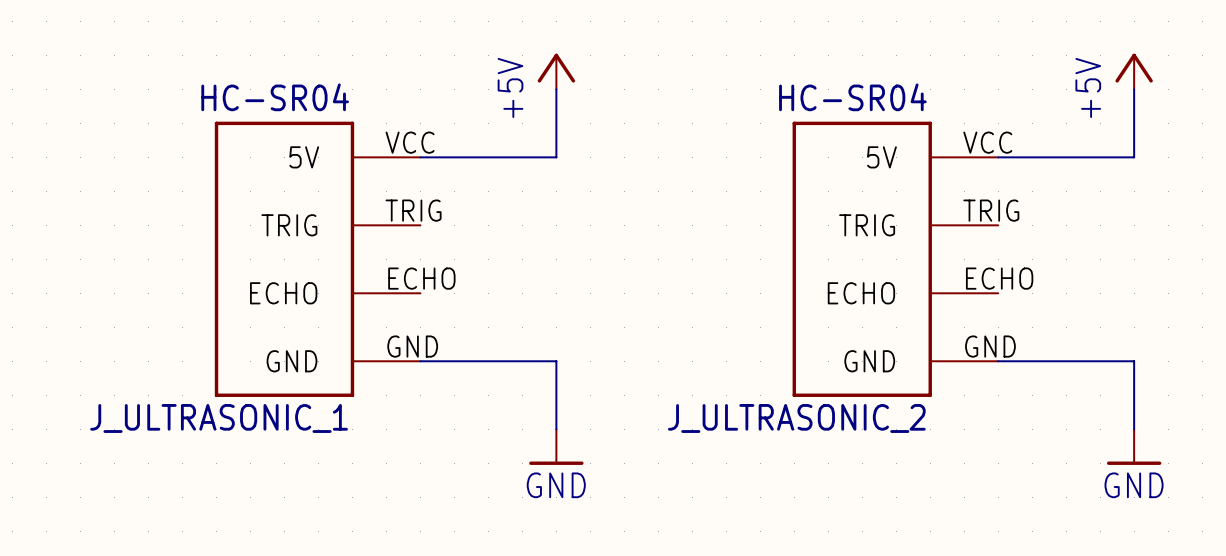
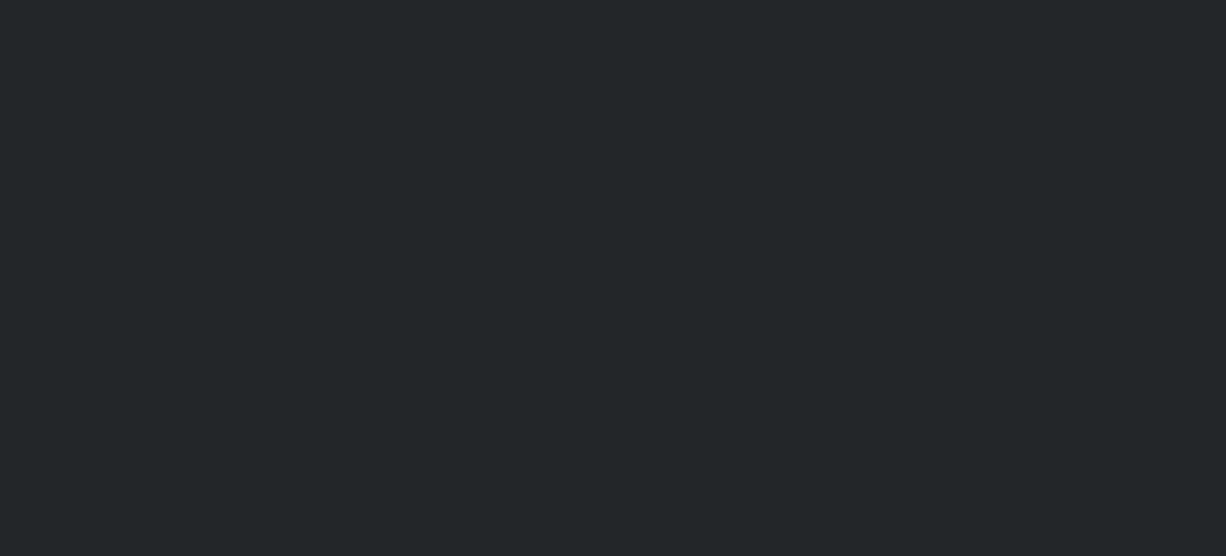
power symbol: +5V (556, 71) -> none
power symbol: +5V (1134, 71) -> none
wire: (556, 89) (556, 157) (420, 157) -> none
wire: (1134, 89) (1134, 157) (998, 157) -> none
J_ULTRASONIC_1: HC-SR04 (317, 259) -> none
J_ULTRASONIC_2: HC-SR04 (895, 259) -> none
wire: (420, 361) (556, 361) (556, 429) -> none
wire: (998, 361) (1134, 361) (1134, 429) -> none
power symbol: GND (556, 447) -> none
power symbol: GND (1134, 447) -> none

